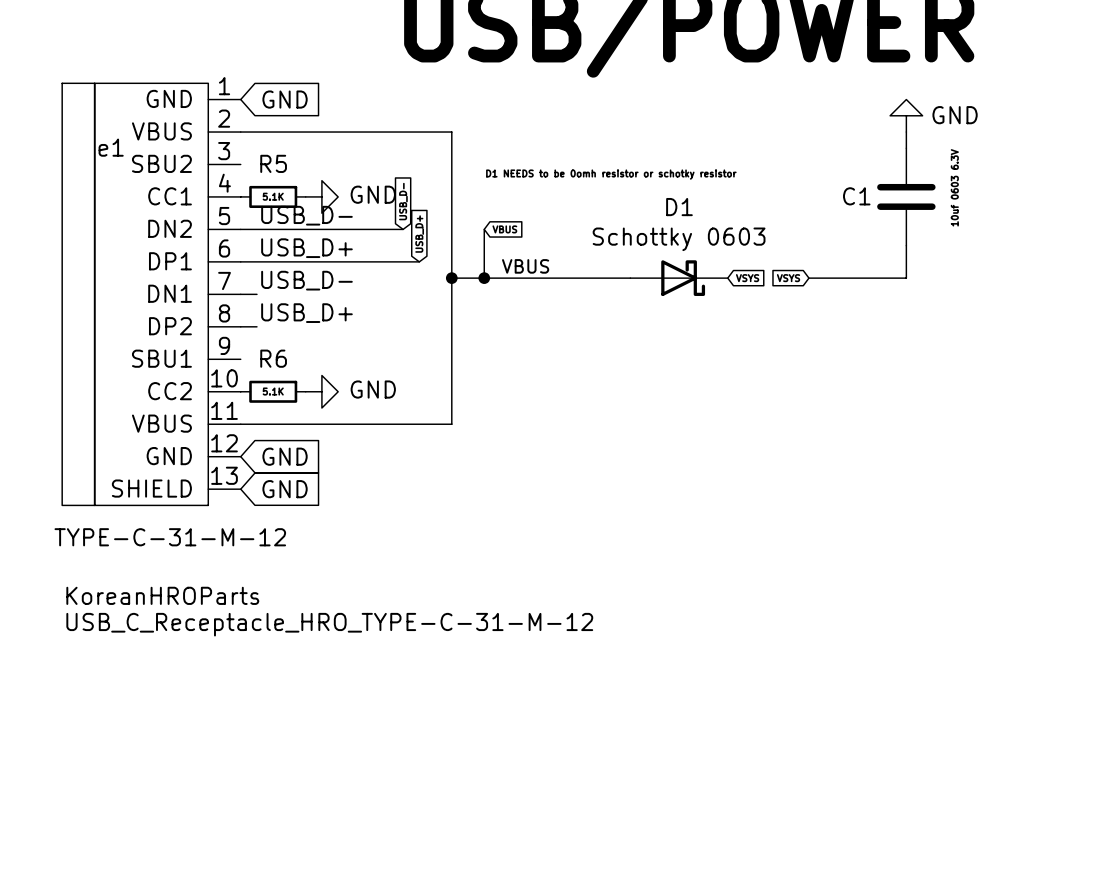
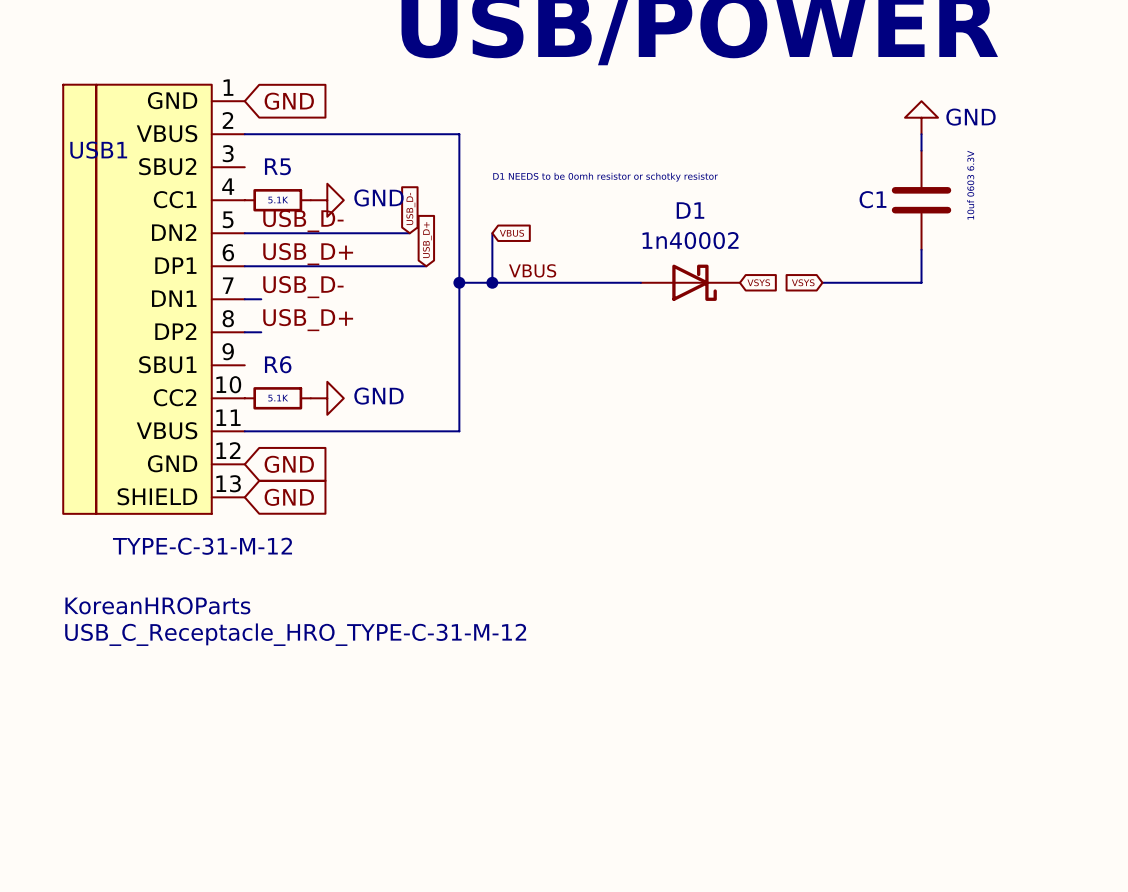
e1 name: e1 (111, 147) -> USB1 (98, 150)
D1 value: Schottky 0603 (679, 239) -> 1n40002 (690, 240)

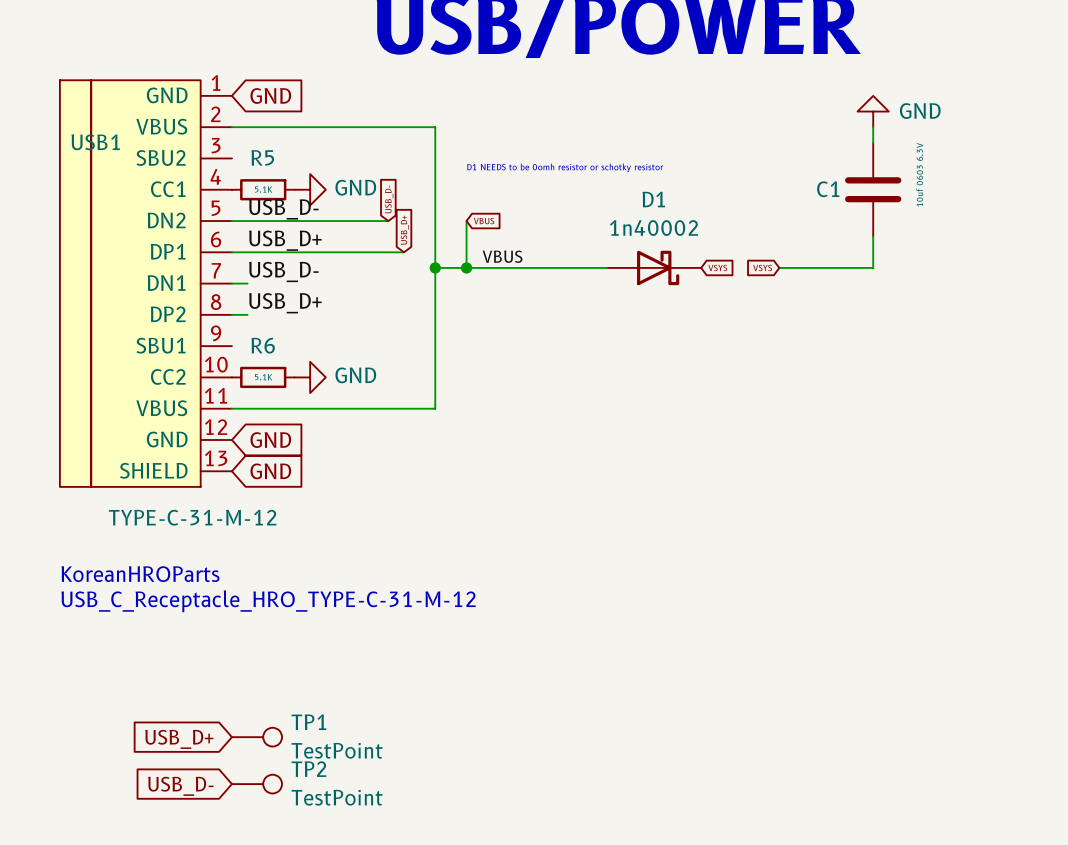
TP1: none -> TestPoint (256, 737)
global label: none -> USB_D+ (179, 739)
TP2: none -> TestPoint (256, 784)
global label: none -> USB_D- (180, 786)

